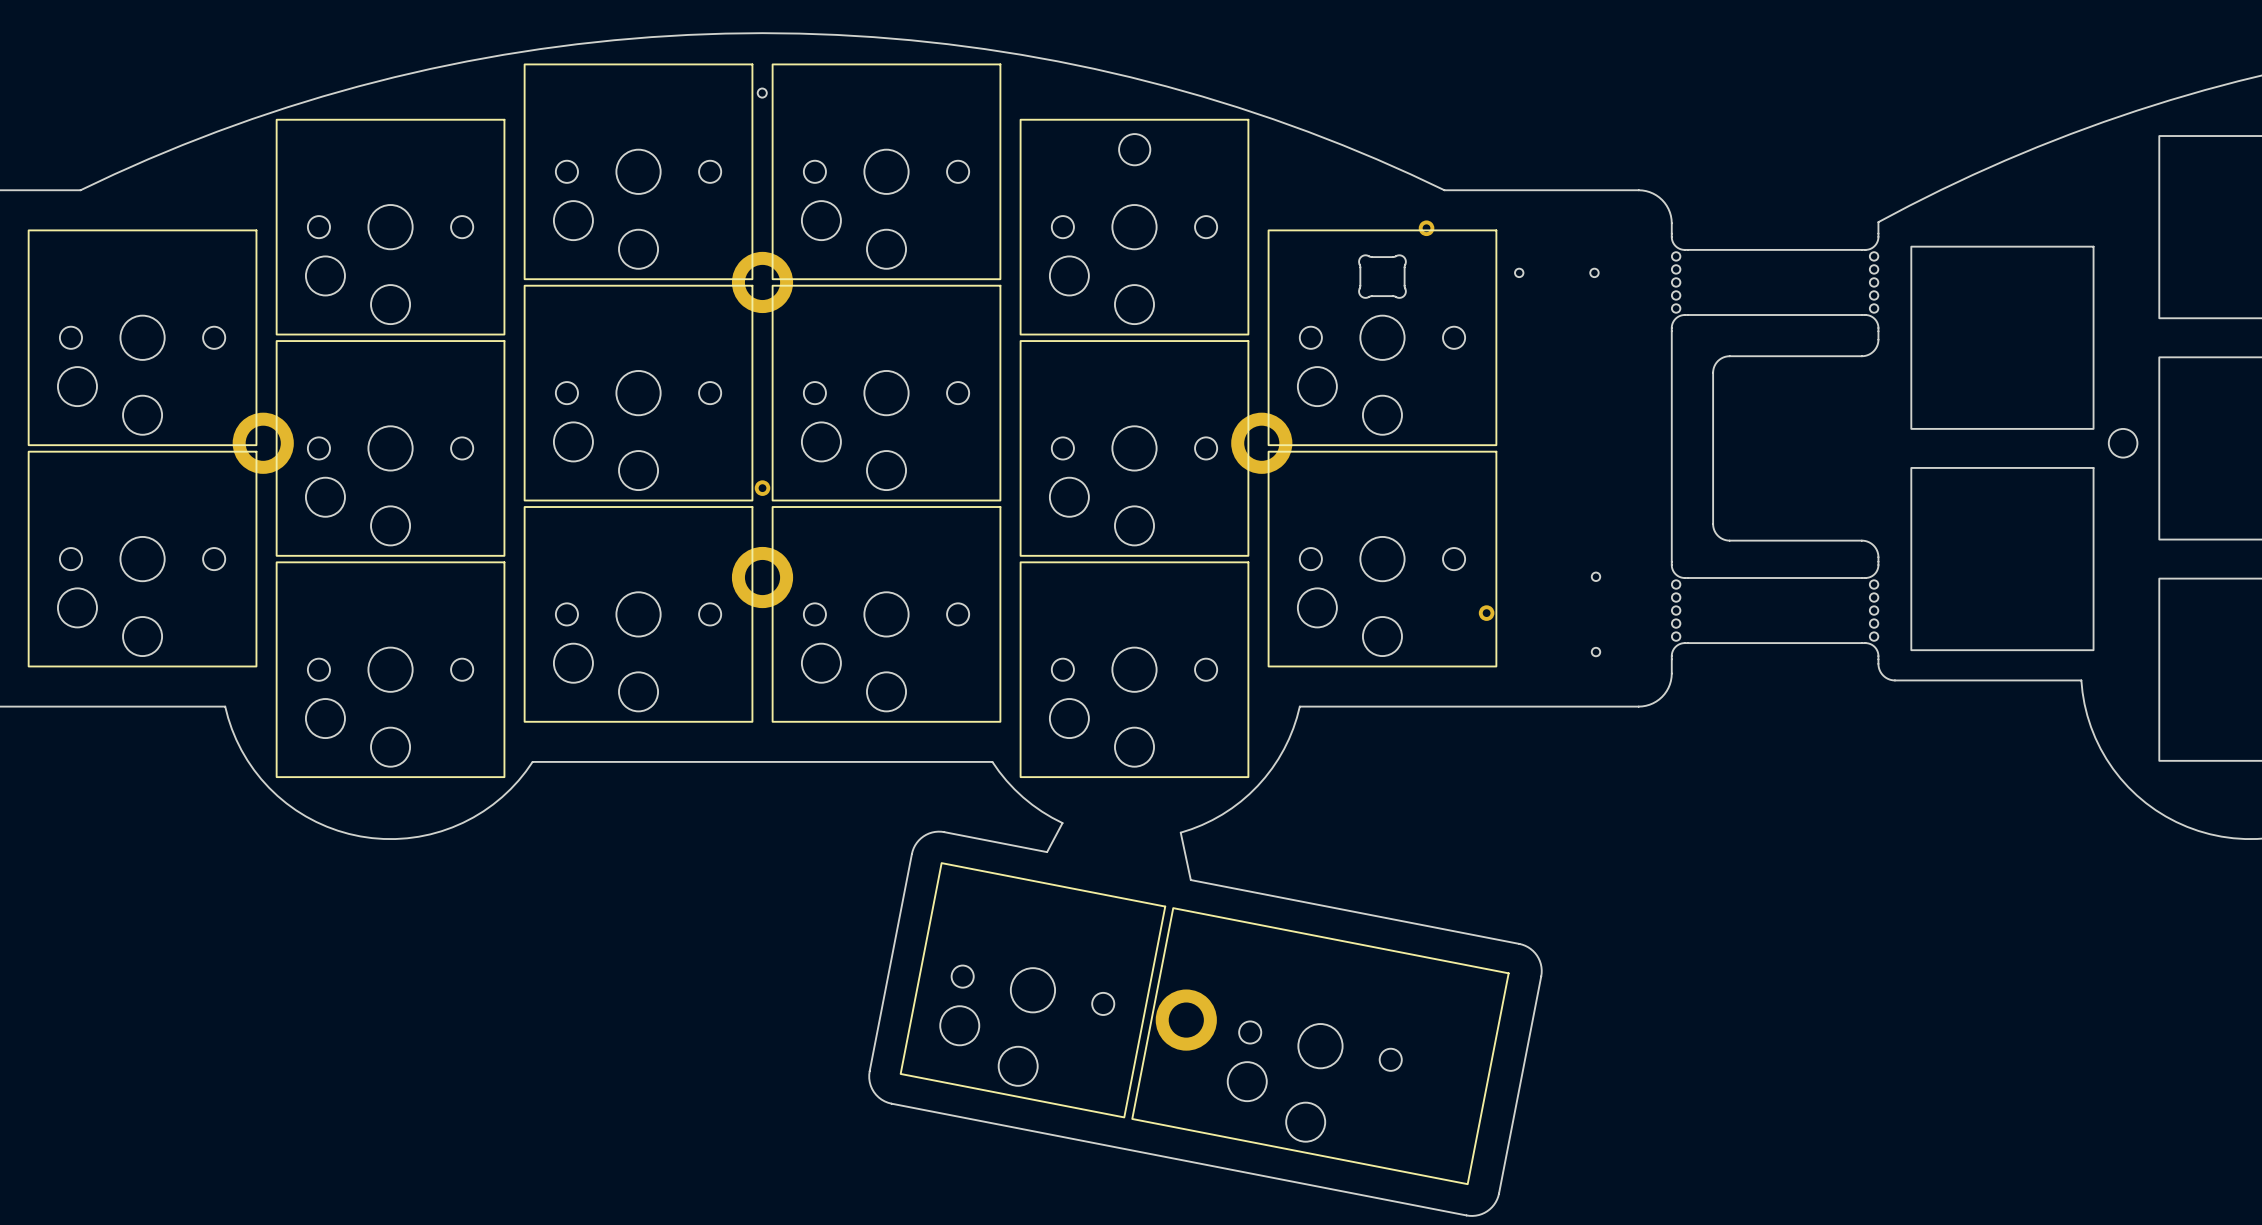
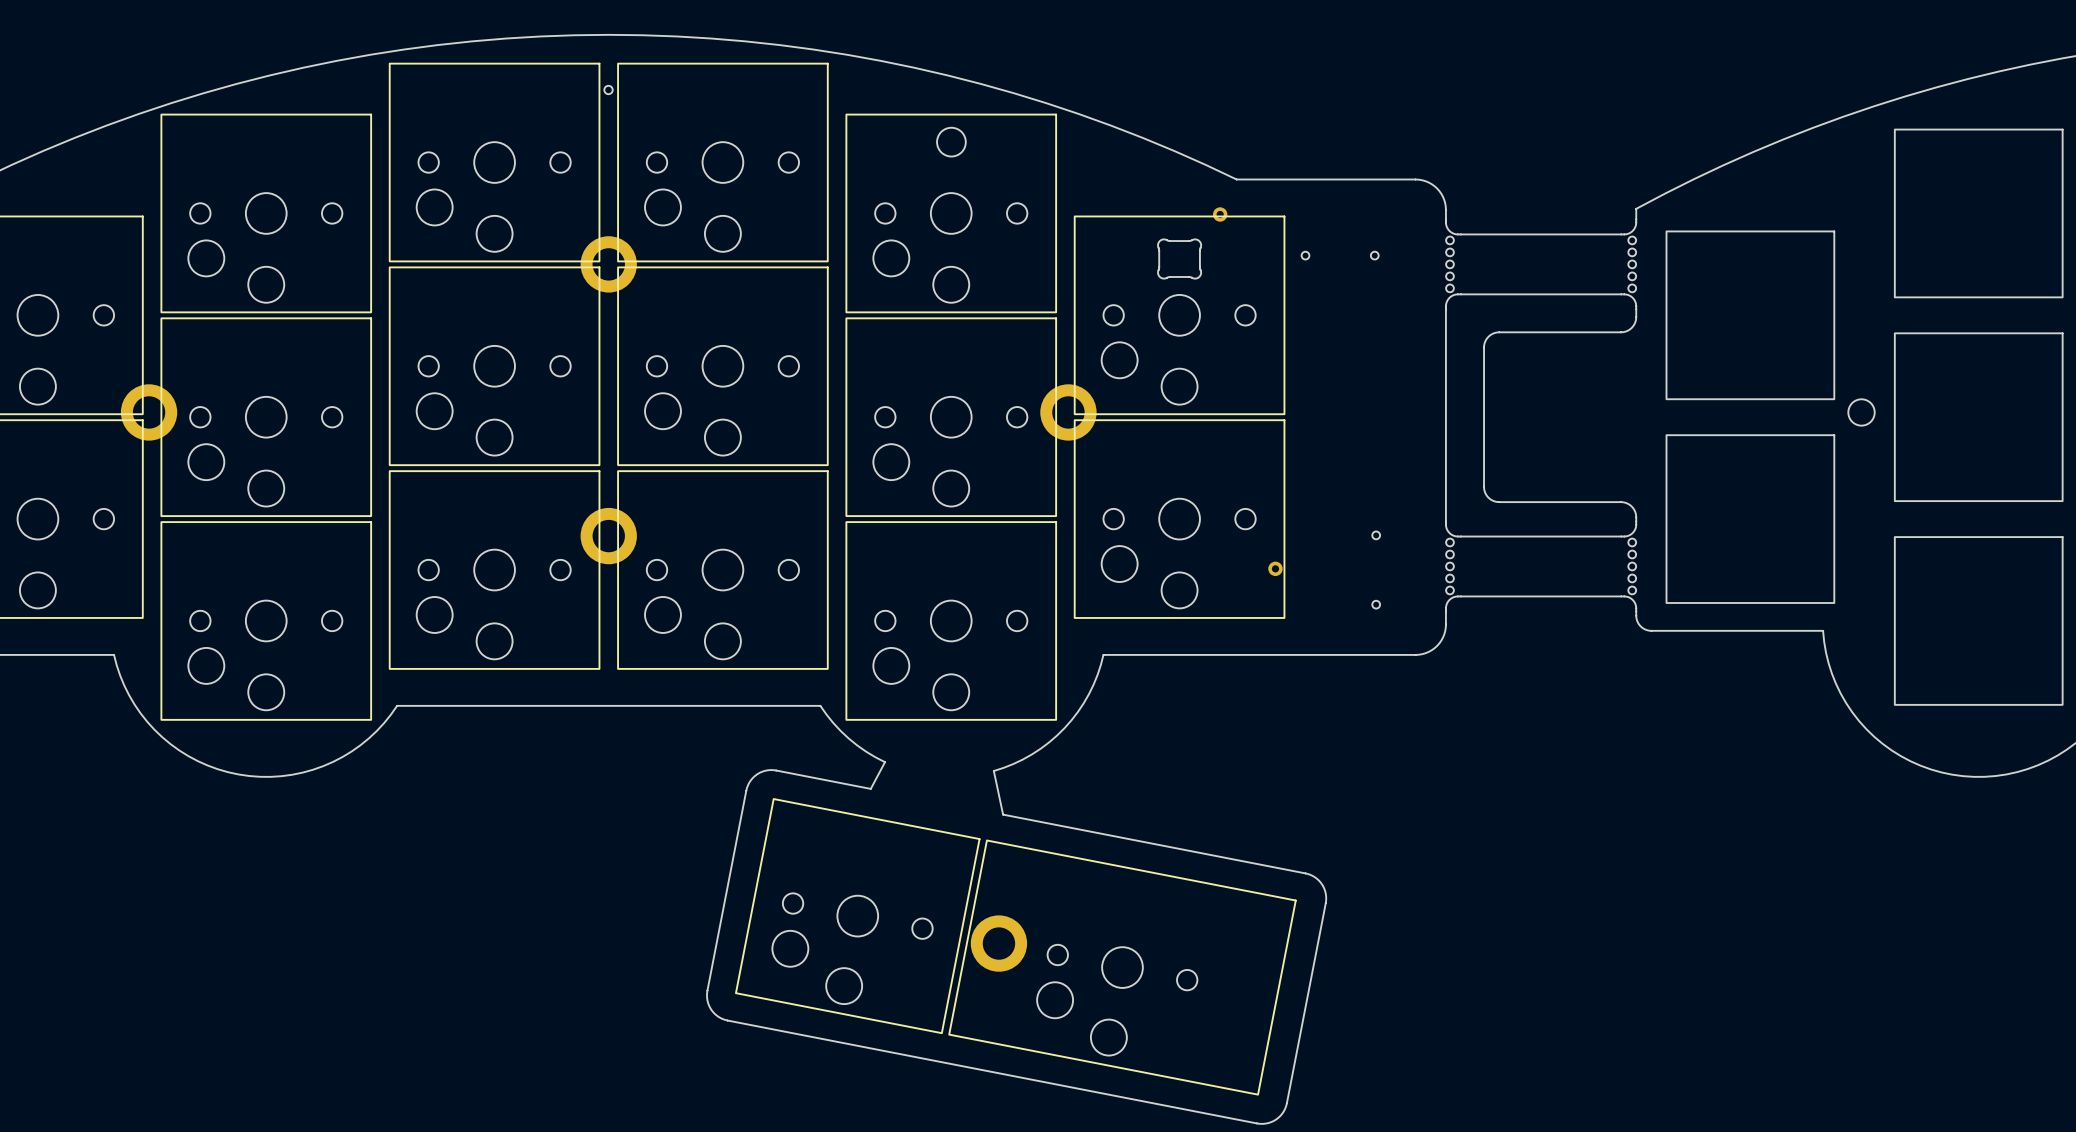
part: (762, 488) -> none

